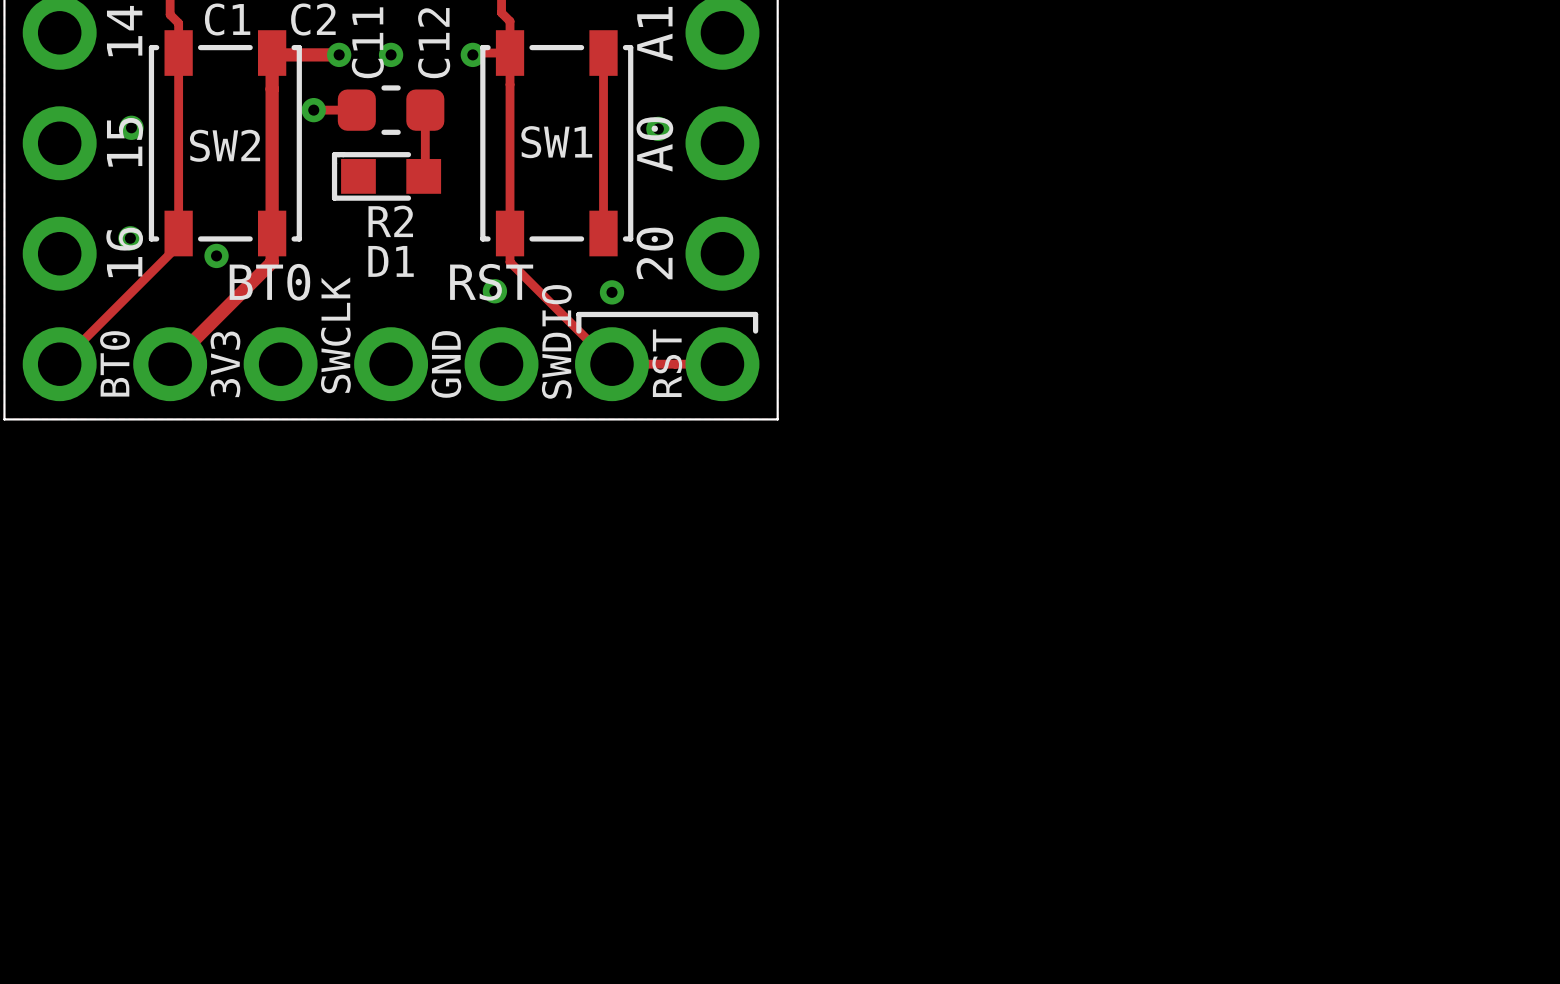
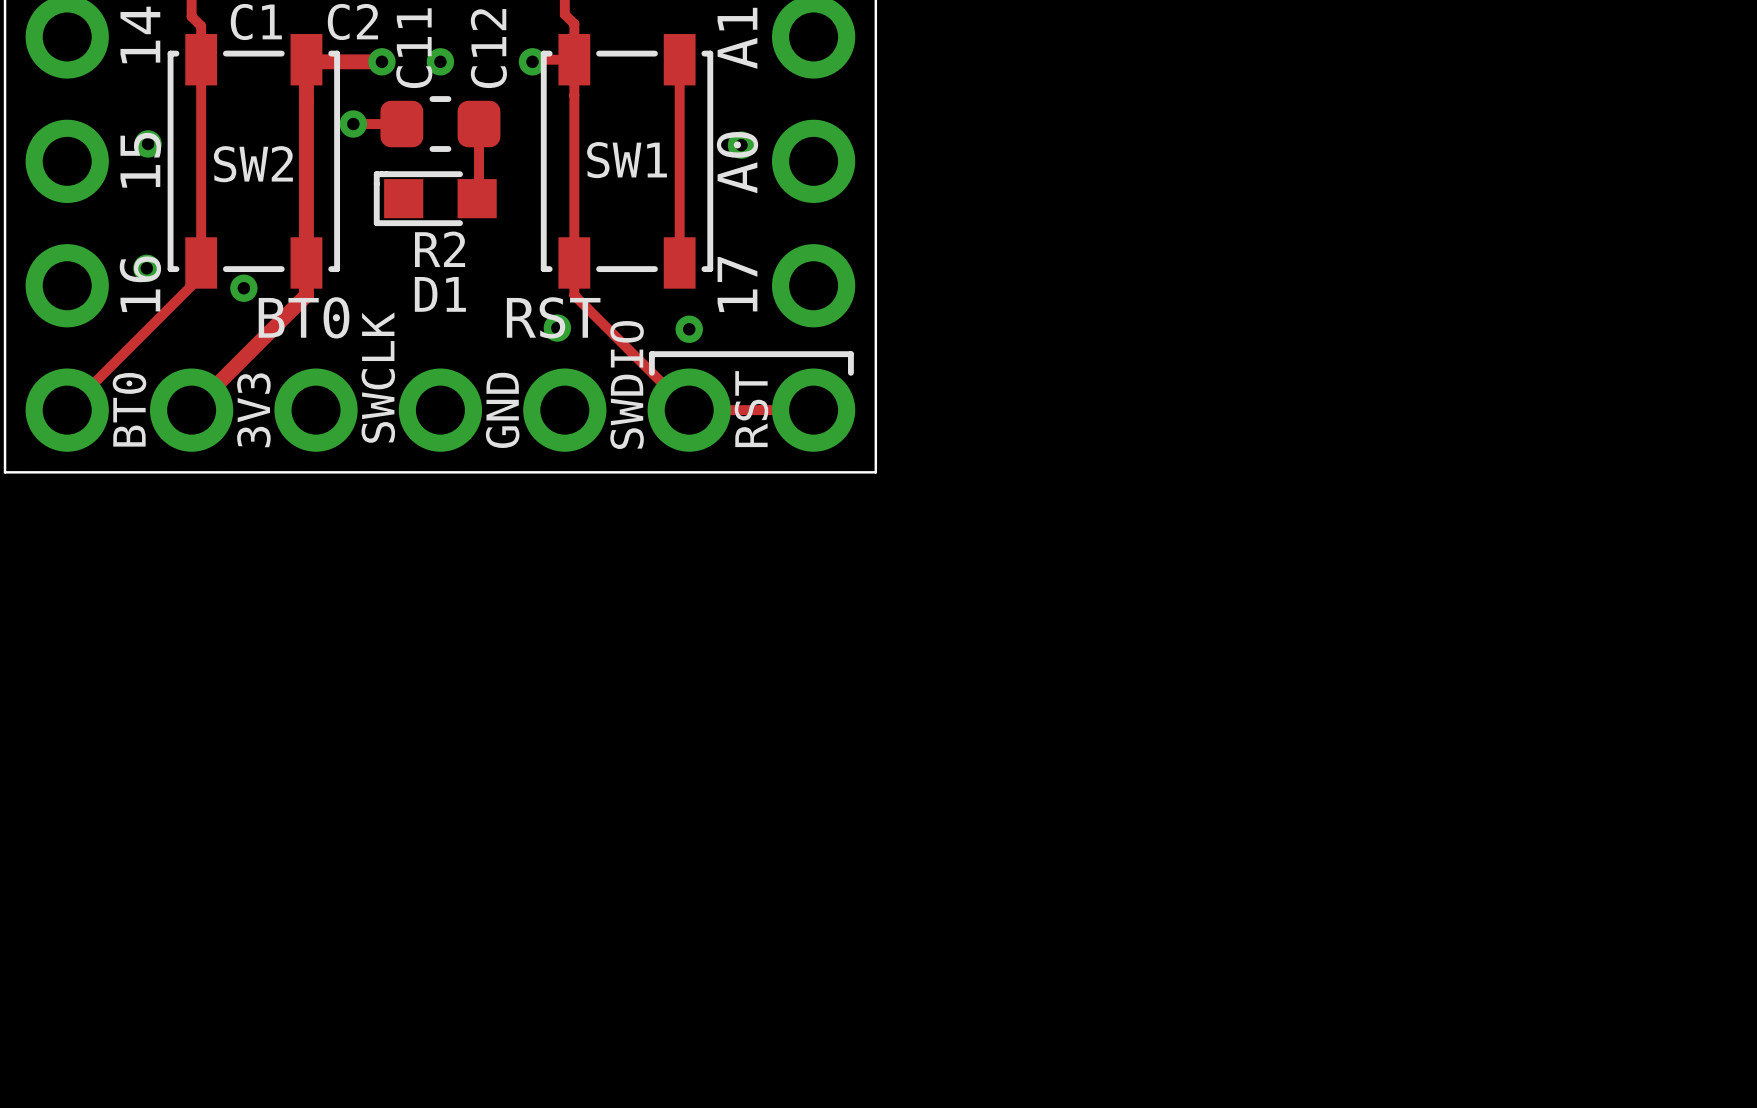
text: 20 (654, 253) -> 17 (737, 284)

